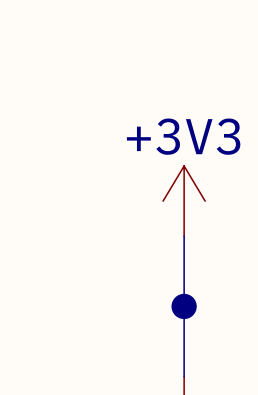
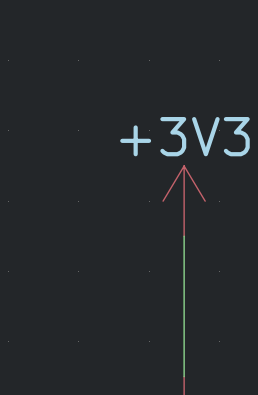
junction: (184, 306) -> none

